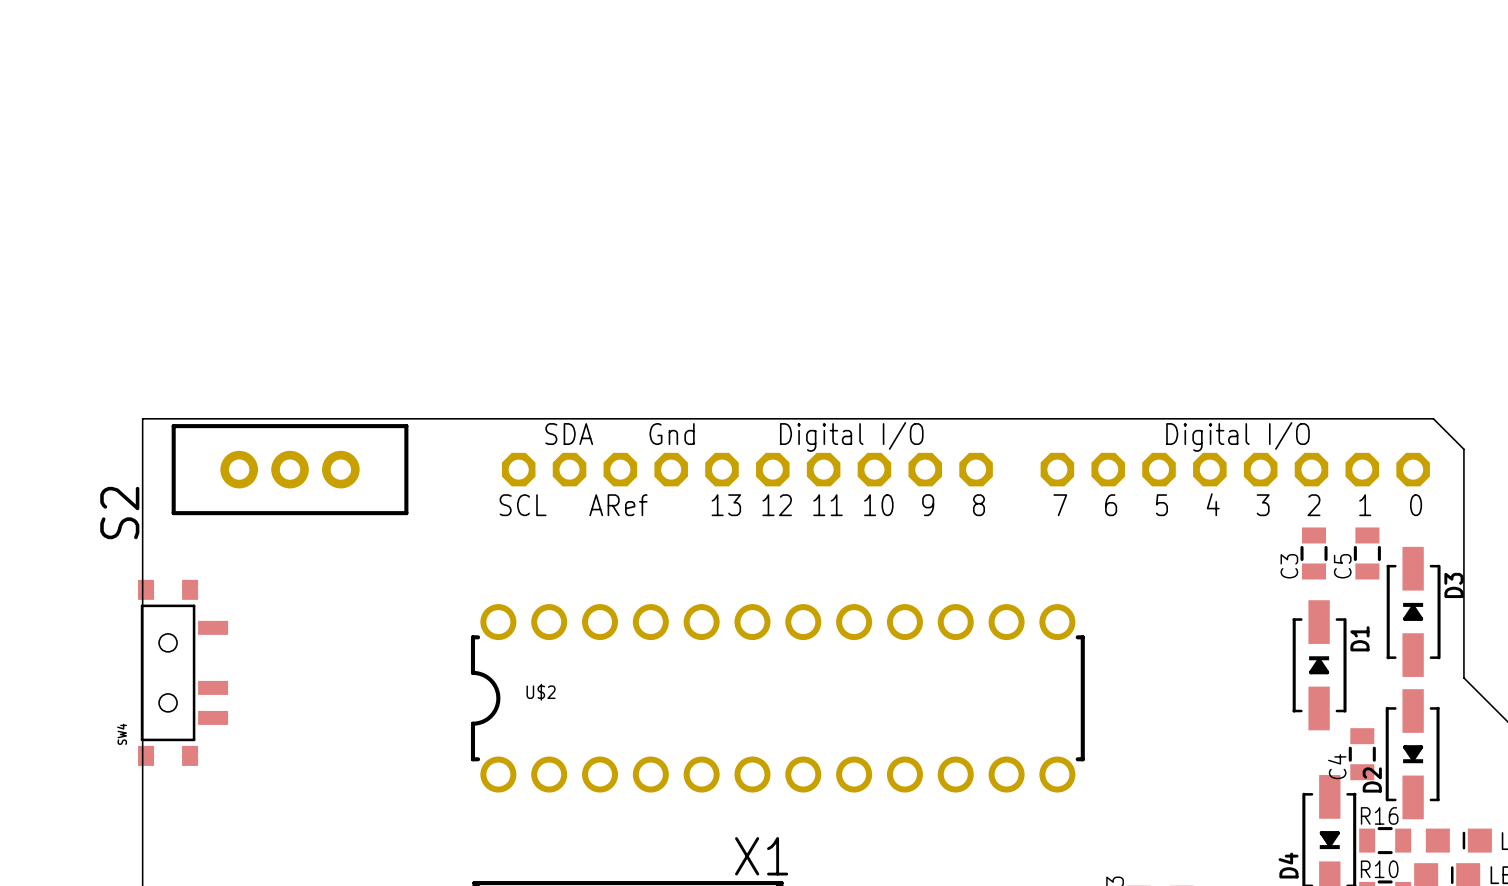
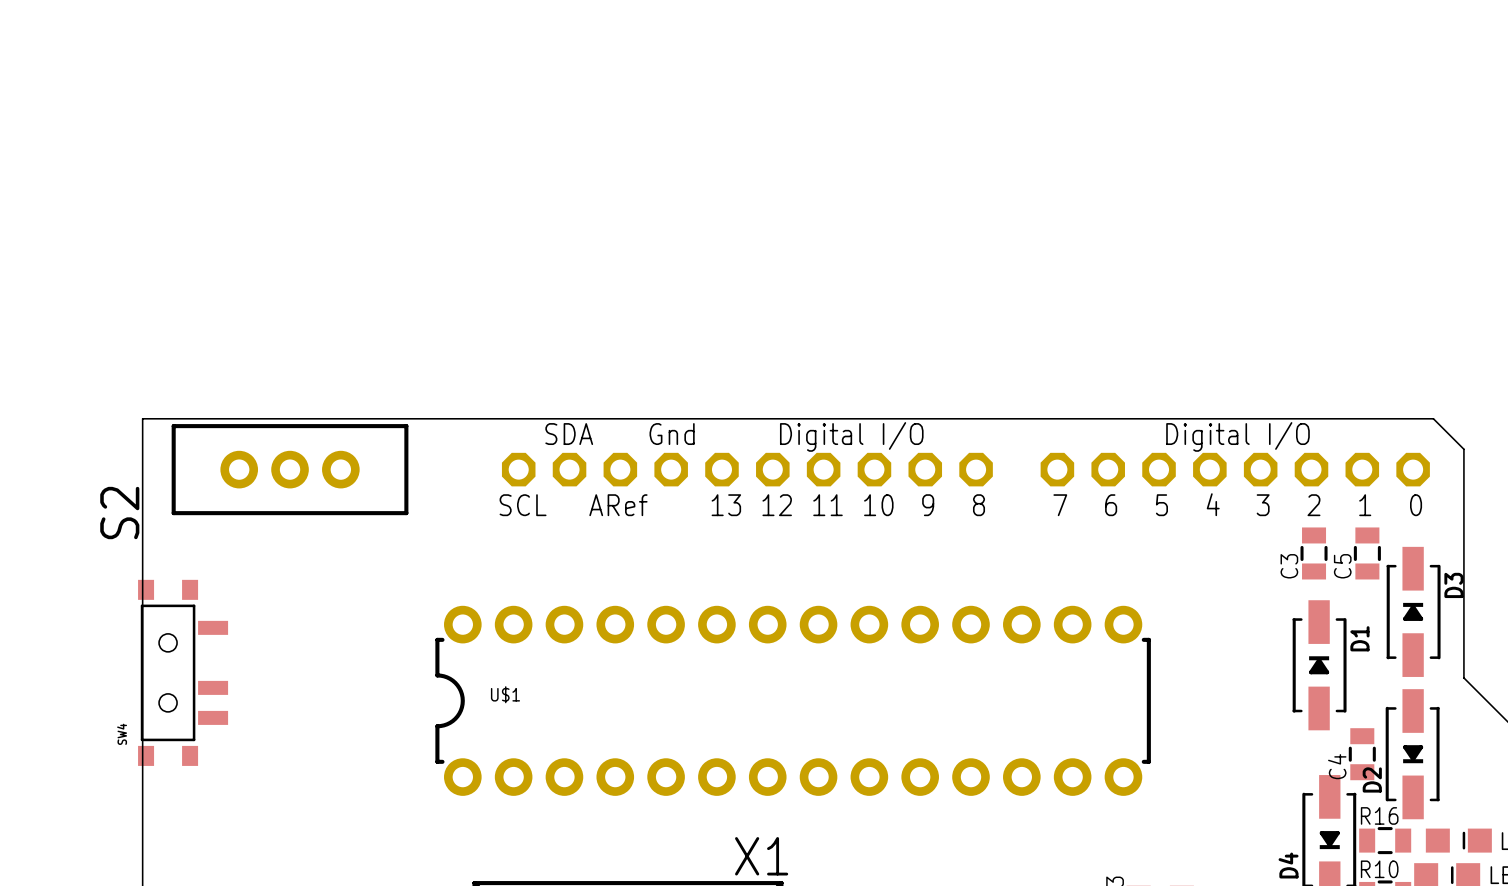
U$2: (777, 698) -> none
U$1: none -> (793, 700)

